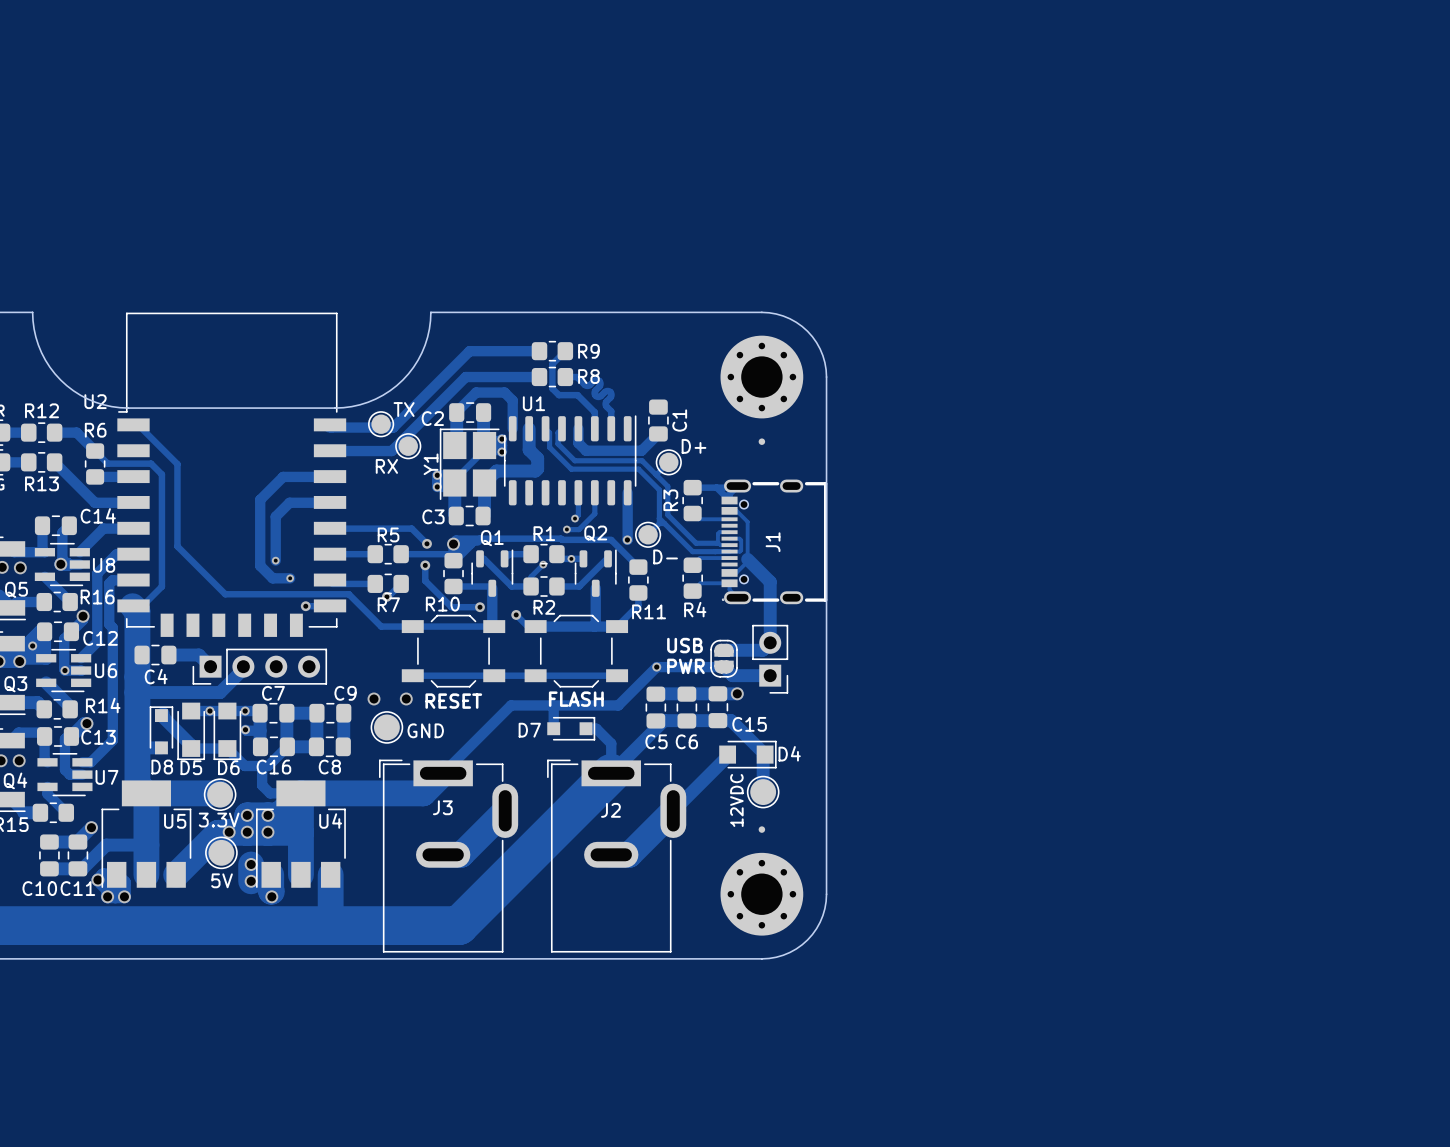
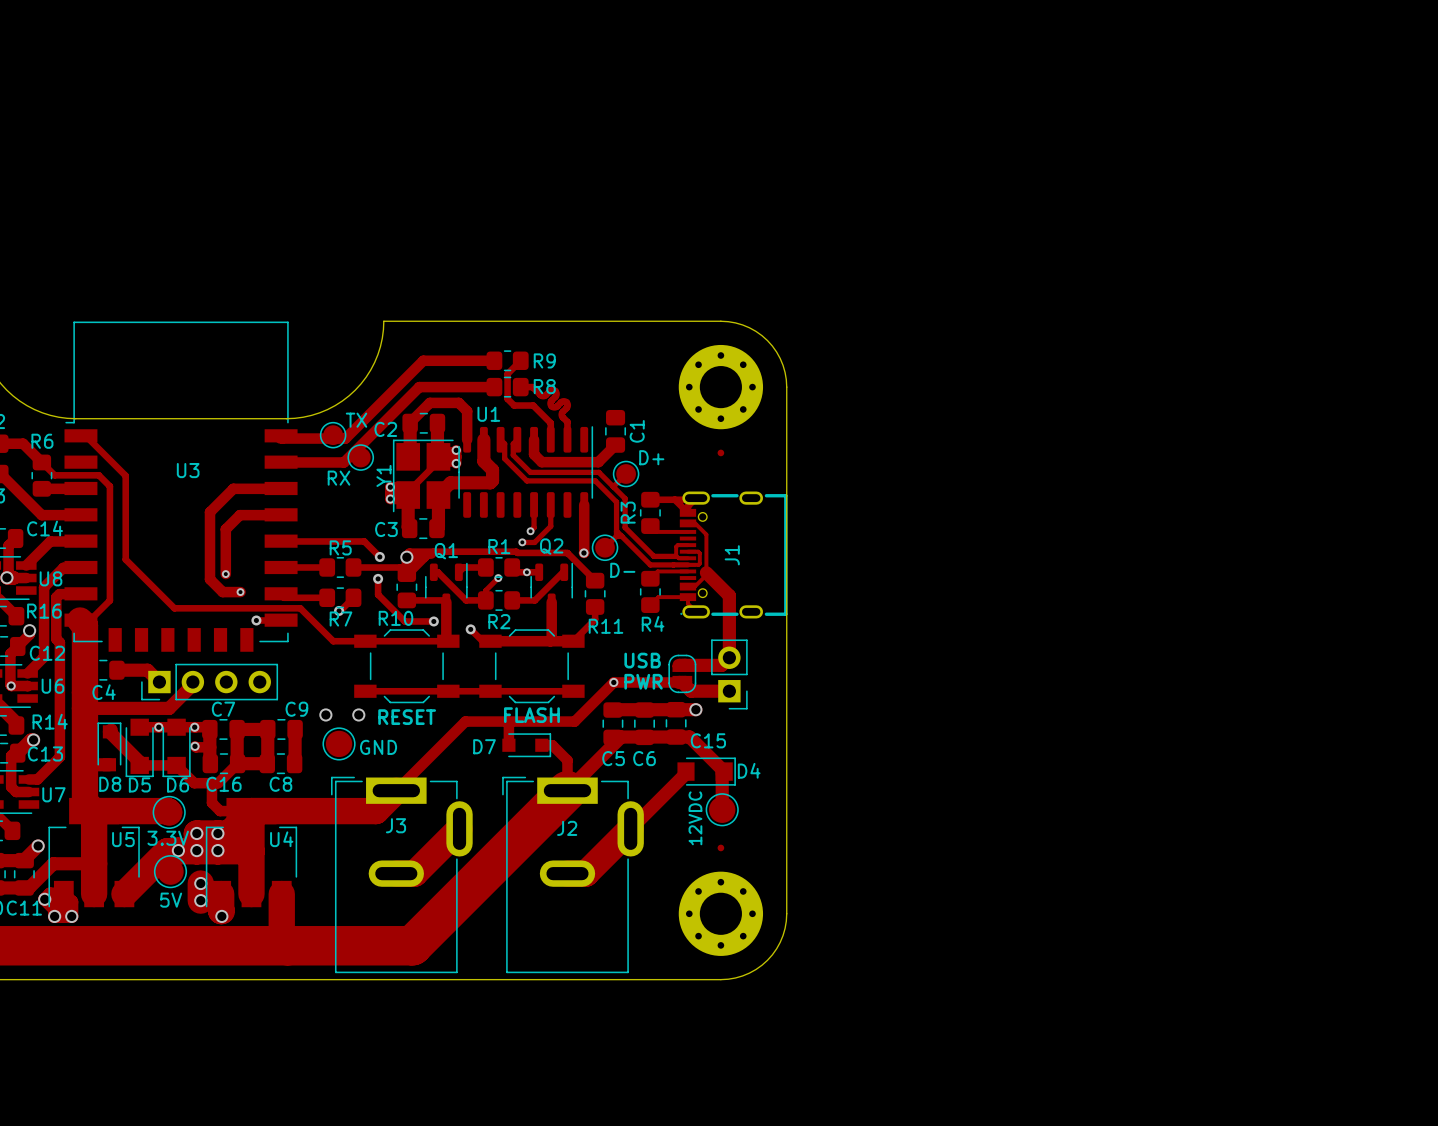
U2 name: U2 (95, 401) -> U3 (188, 470)

